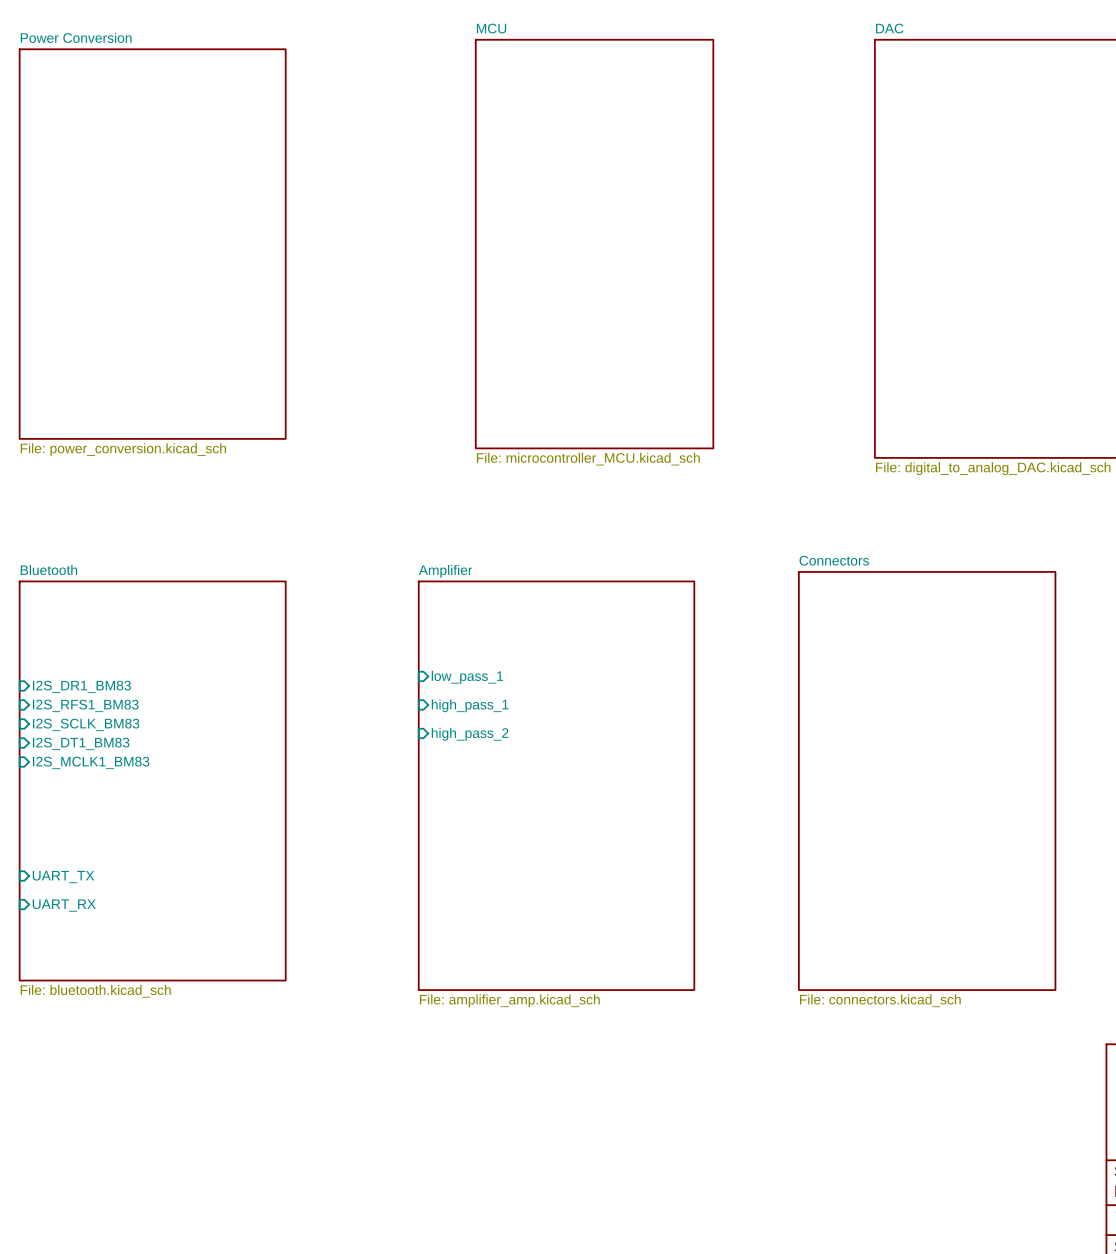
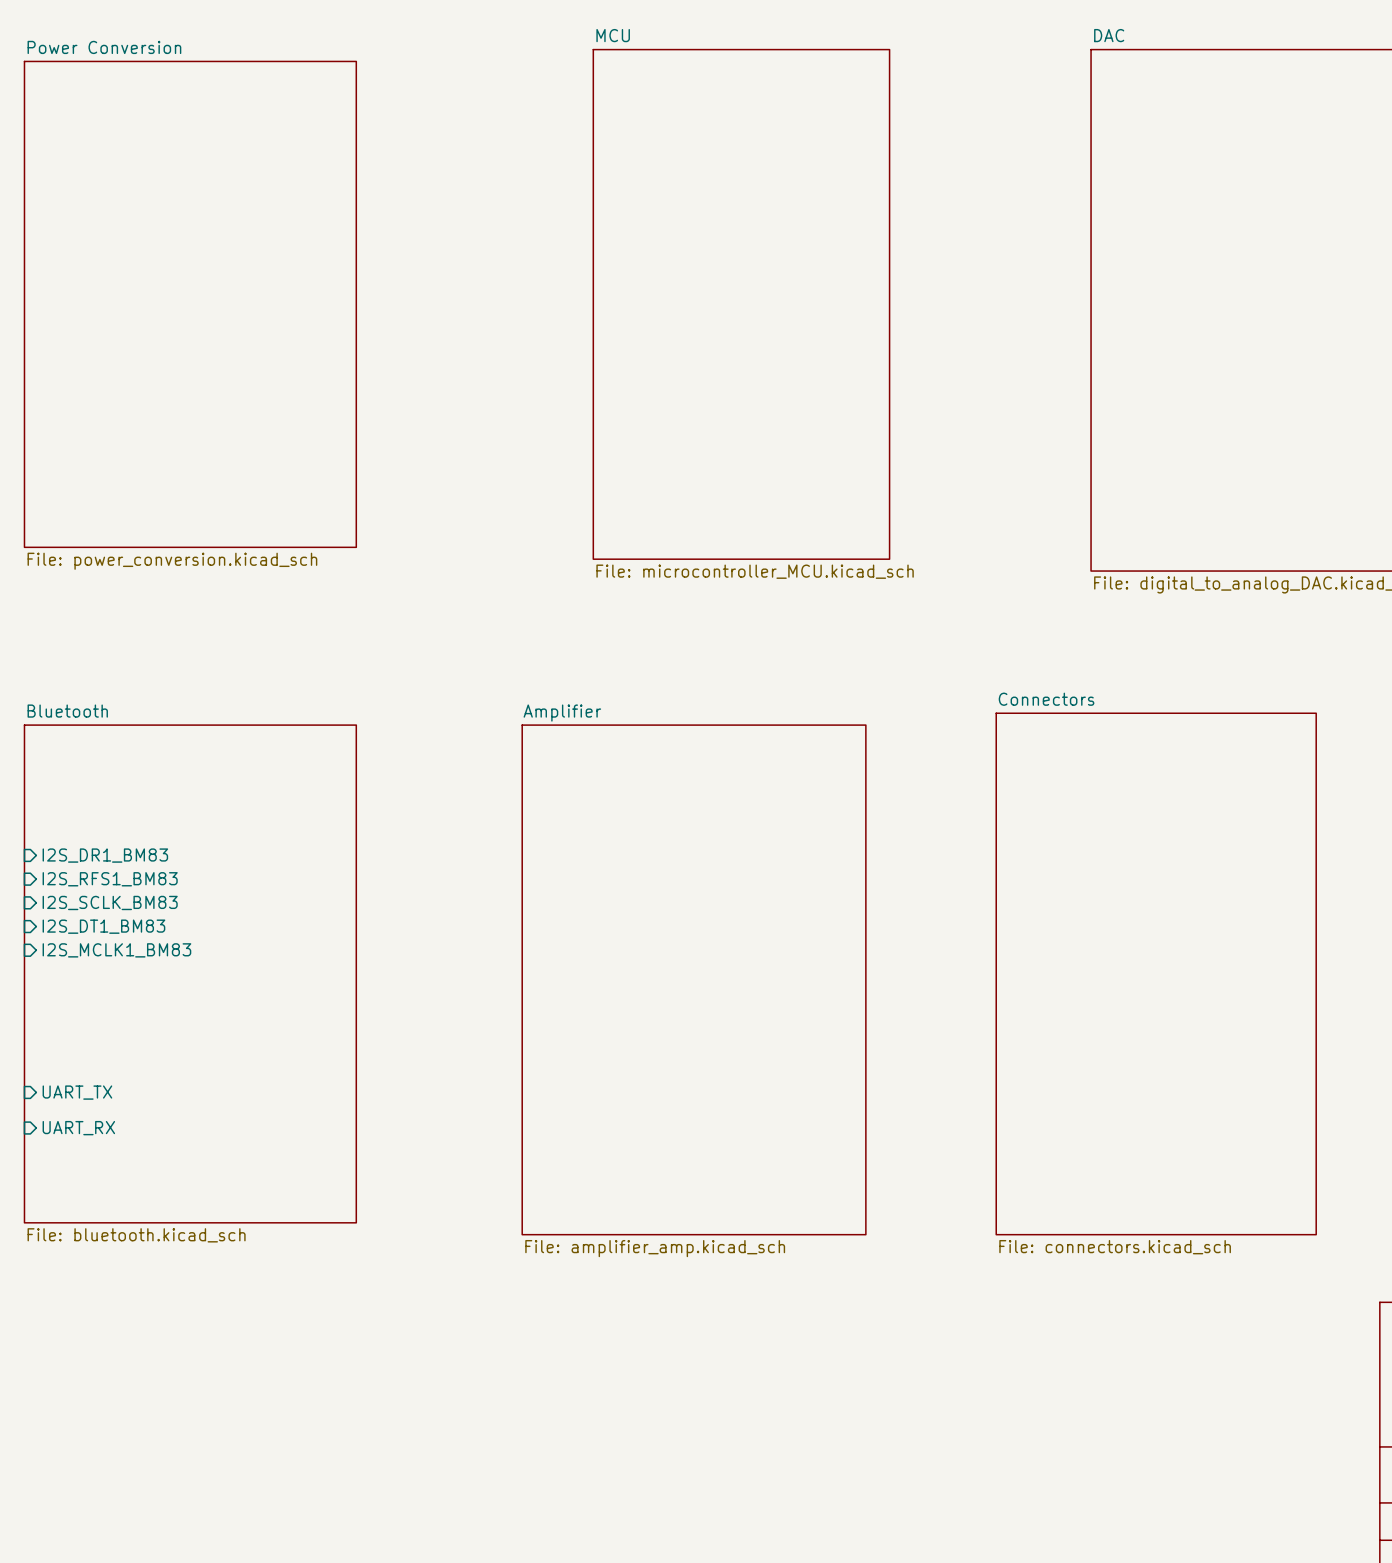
sheet pin: low_pass_1 (467, 677) -> none
sheet pin: high_pass_1 (470, 705) -> none
sheet pin: high_pass_2 (470, 734) -> none

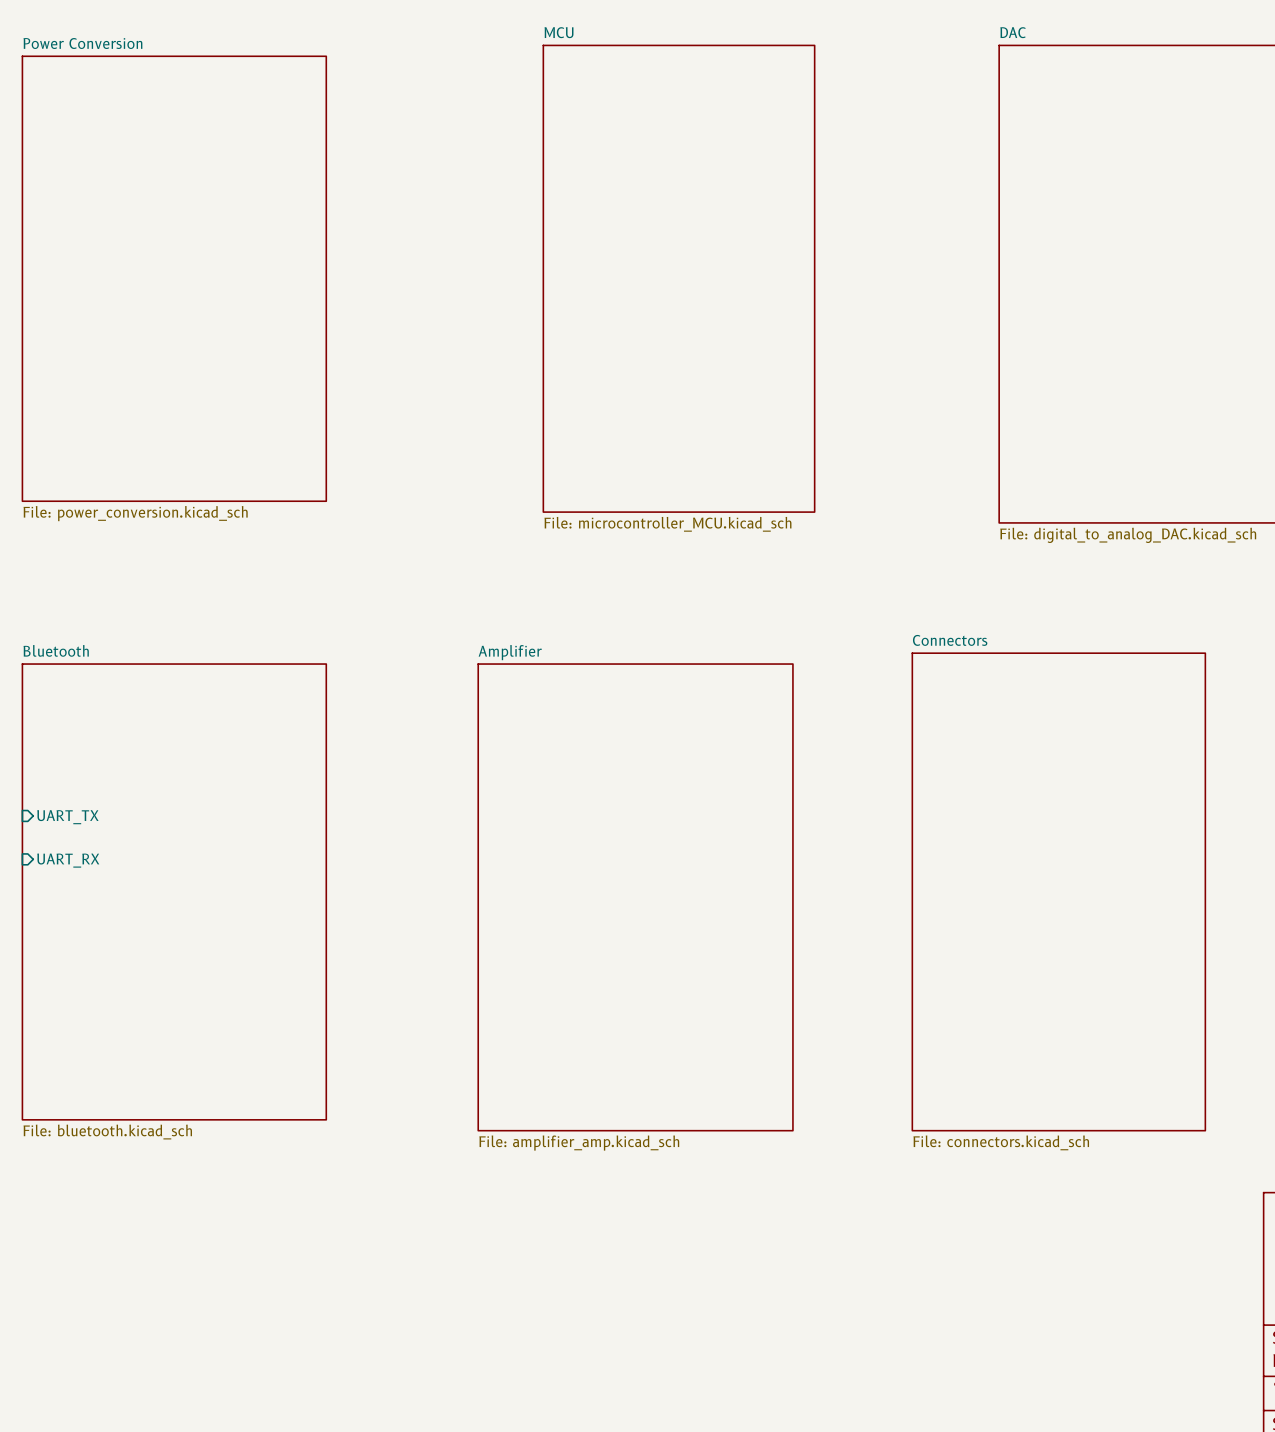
sheet pin: I2S_DR1_BM83 (105, 855) -> none
sheet pin: I2S_RFS1_BM83 (110, 879) -> none
sheet pin: I2S_SCLK_BM83 (110, 902) -> none
sheet pin: I2S_DT1_BM83 (103, 926) -> none
sheet pin: I2S_MCLK1_BM83 (116, 950) -> none
sheet pin position: UART_TX (77, 1092) -> UART_TX (67, 817)
sheet pin position: UART_RX (78, 1128) -> UART_RX (68, 860)

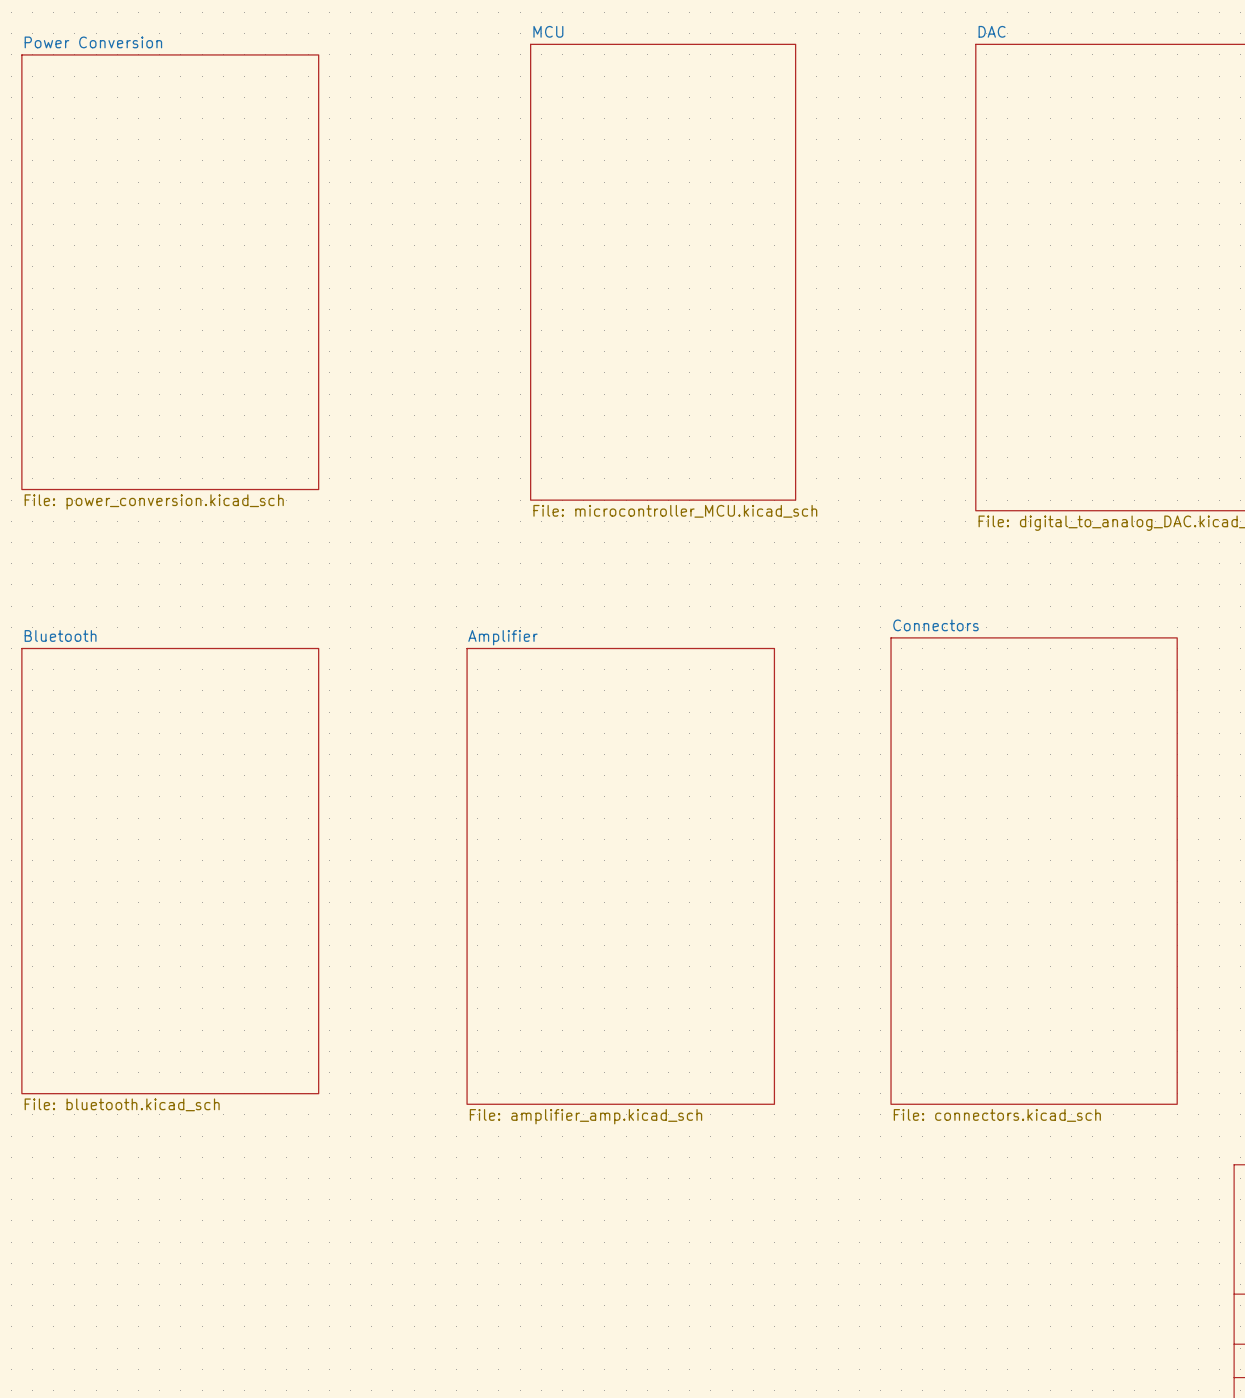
sheet pin: UART_TX (67, 817) -> none
sheet pin: UART_RX (68, 860) -> none

